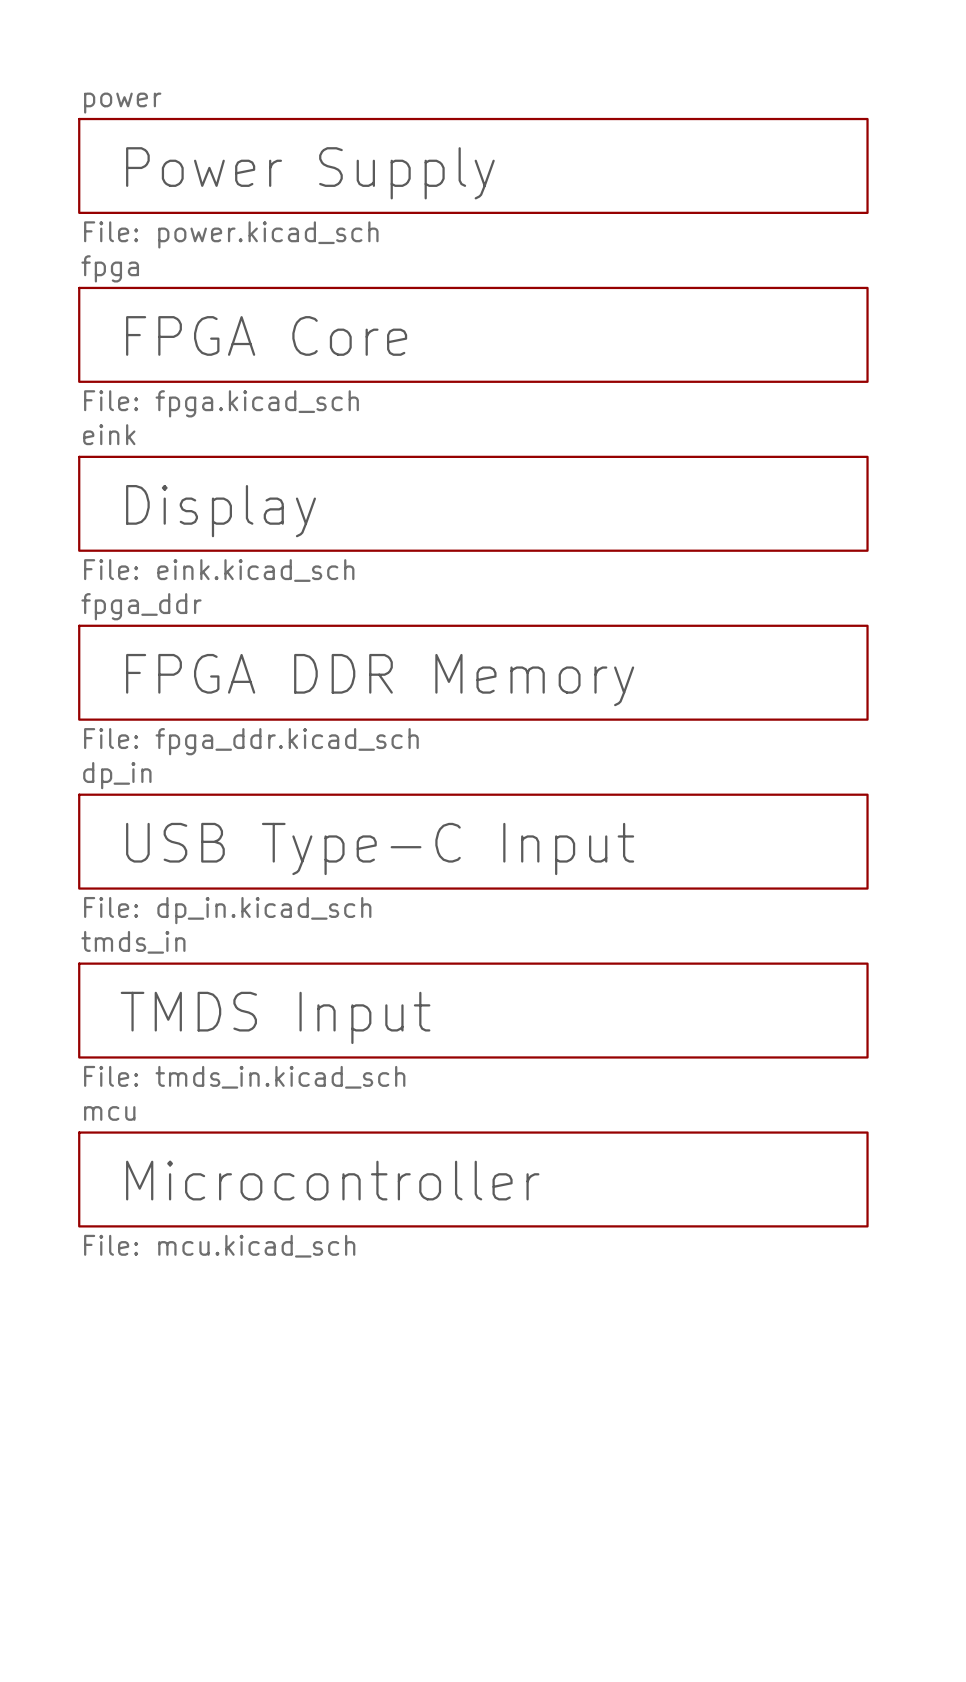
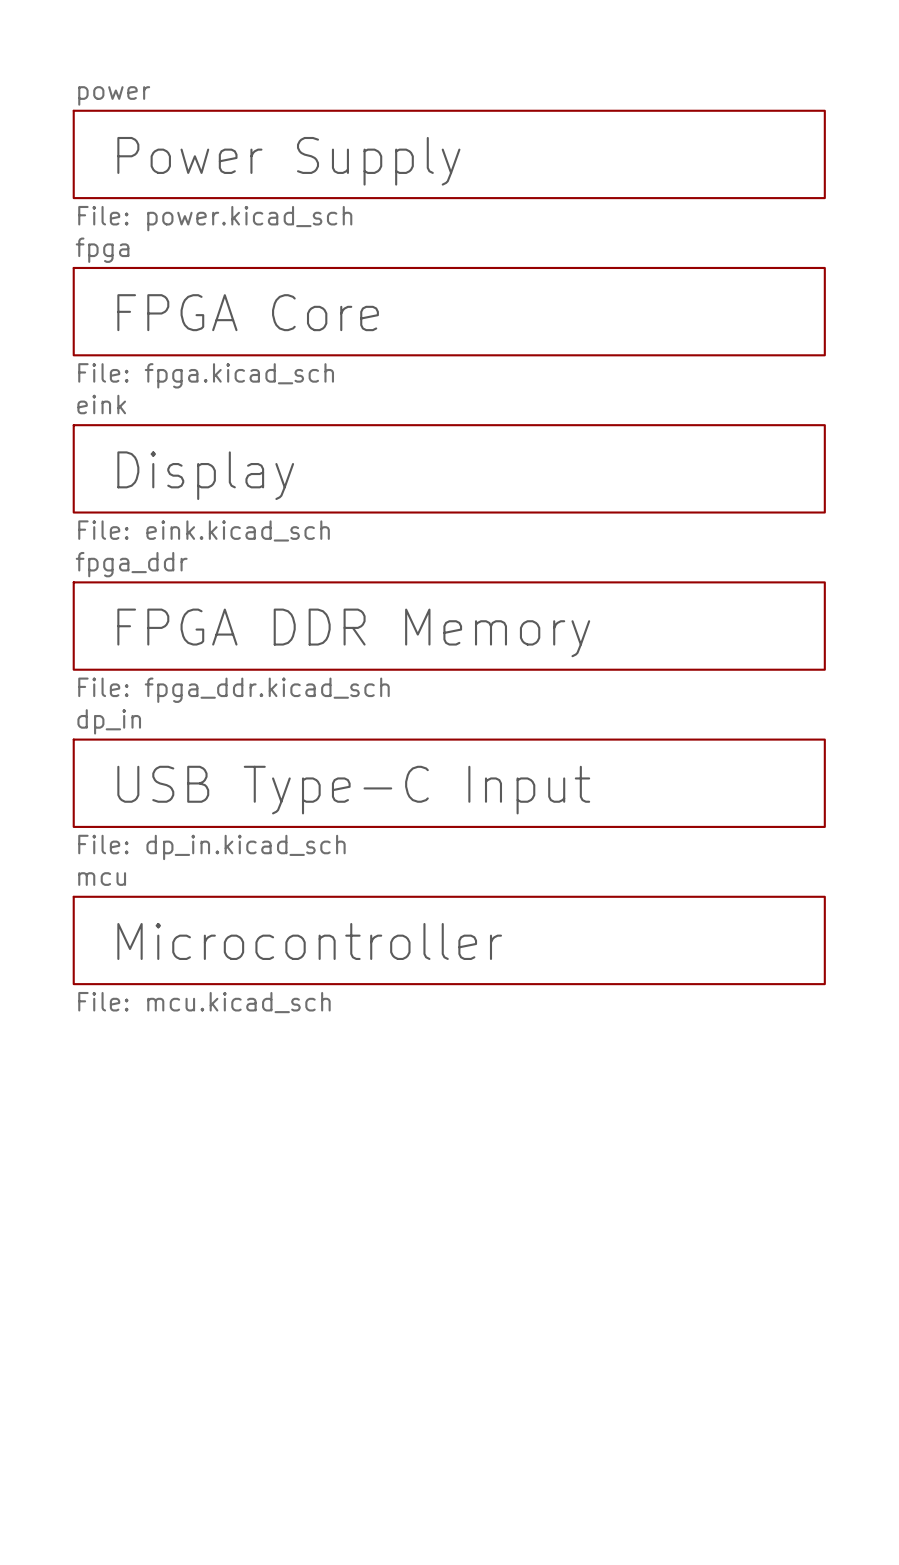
sheet power shape: [78, 117, 869, 214] -> [72, 109, 826, 200]
sheet fpga shape: [78, 286, 869, 383] -> [72, 266, 826, 357]
sheet eink shape: [78, 455, 869, 552] -> [72, 424, 826, 514]
sheet fpga_ddr shape: [78, 624, 869, 721] -> [72, 581, 826, 671]
sheet dp_in shape: [78, 793, 869, 890] -> [72, 738, 826, 828]
sheet tmds_in: File: tmds_in.kicad_sch (473, 1010) -> none
sheet mcu: none -> File: mcu.kicad_sch (449, 940)
text: TMDS Input (275, 1017) -> Microcontroller (309, 941)
sheet mcu: File: mcu.kicad_sch (473, 1179) -> none
text: Microcontroller (332, 1180) -> none

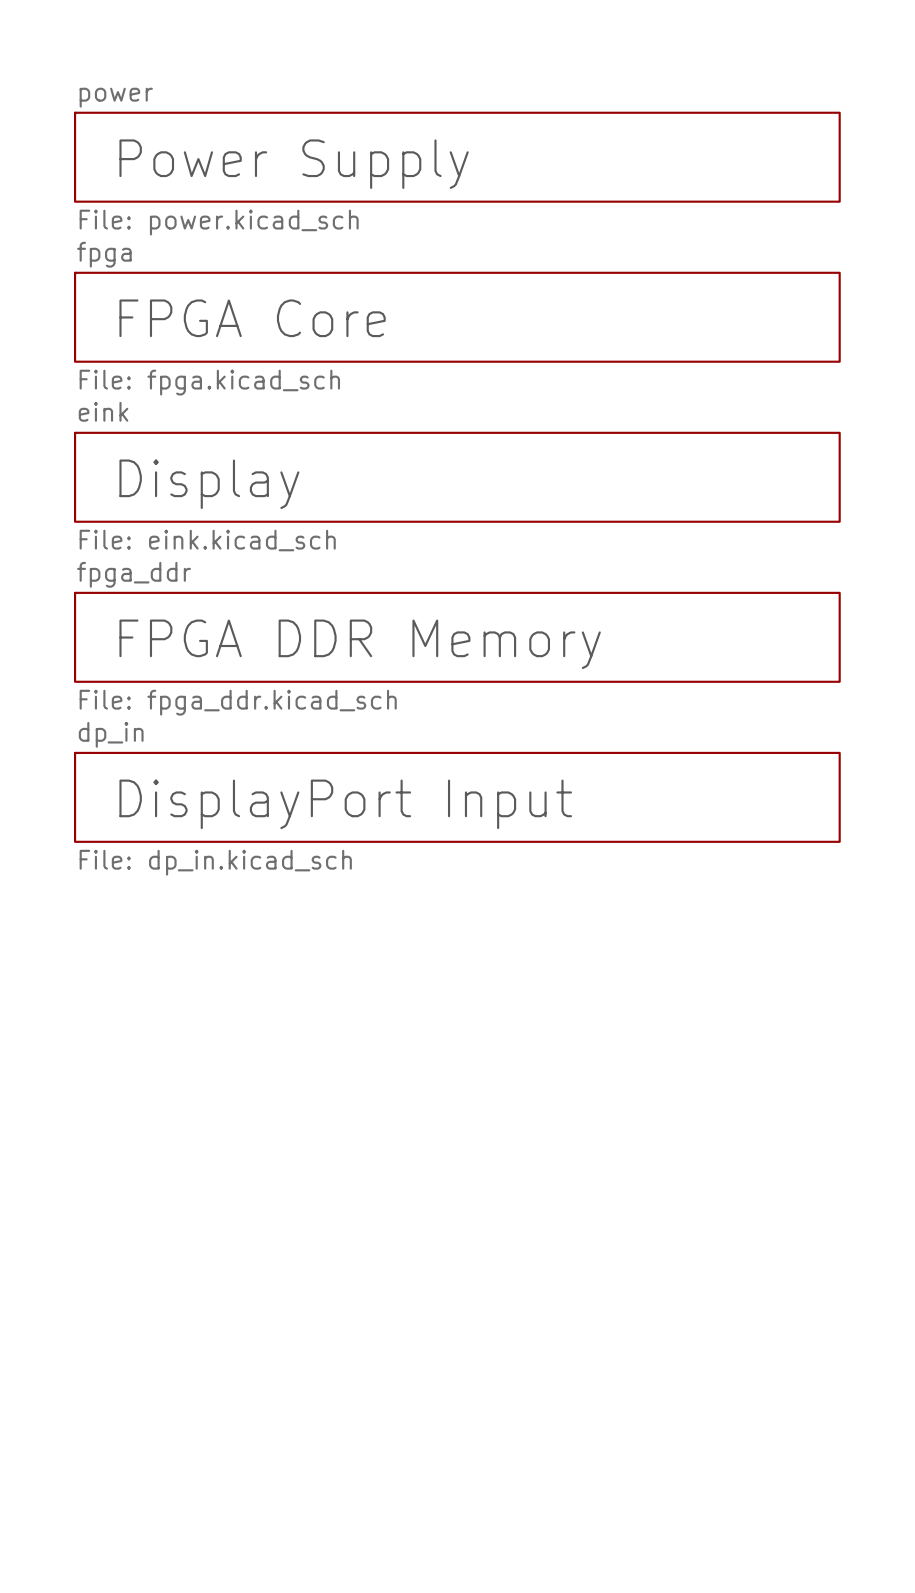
text: USB Type-C Input (353, 790) -> DisplayPort Input (345, 804)
sheet mcu: File: mcu.kicad_sch (449, 940) -> none
text: Microcontroller (309, 941) -> none

